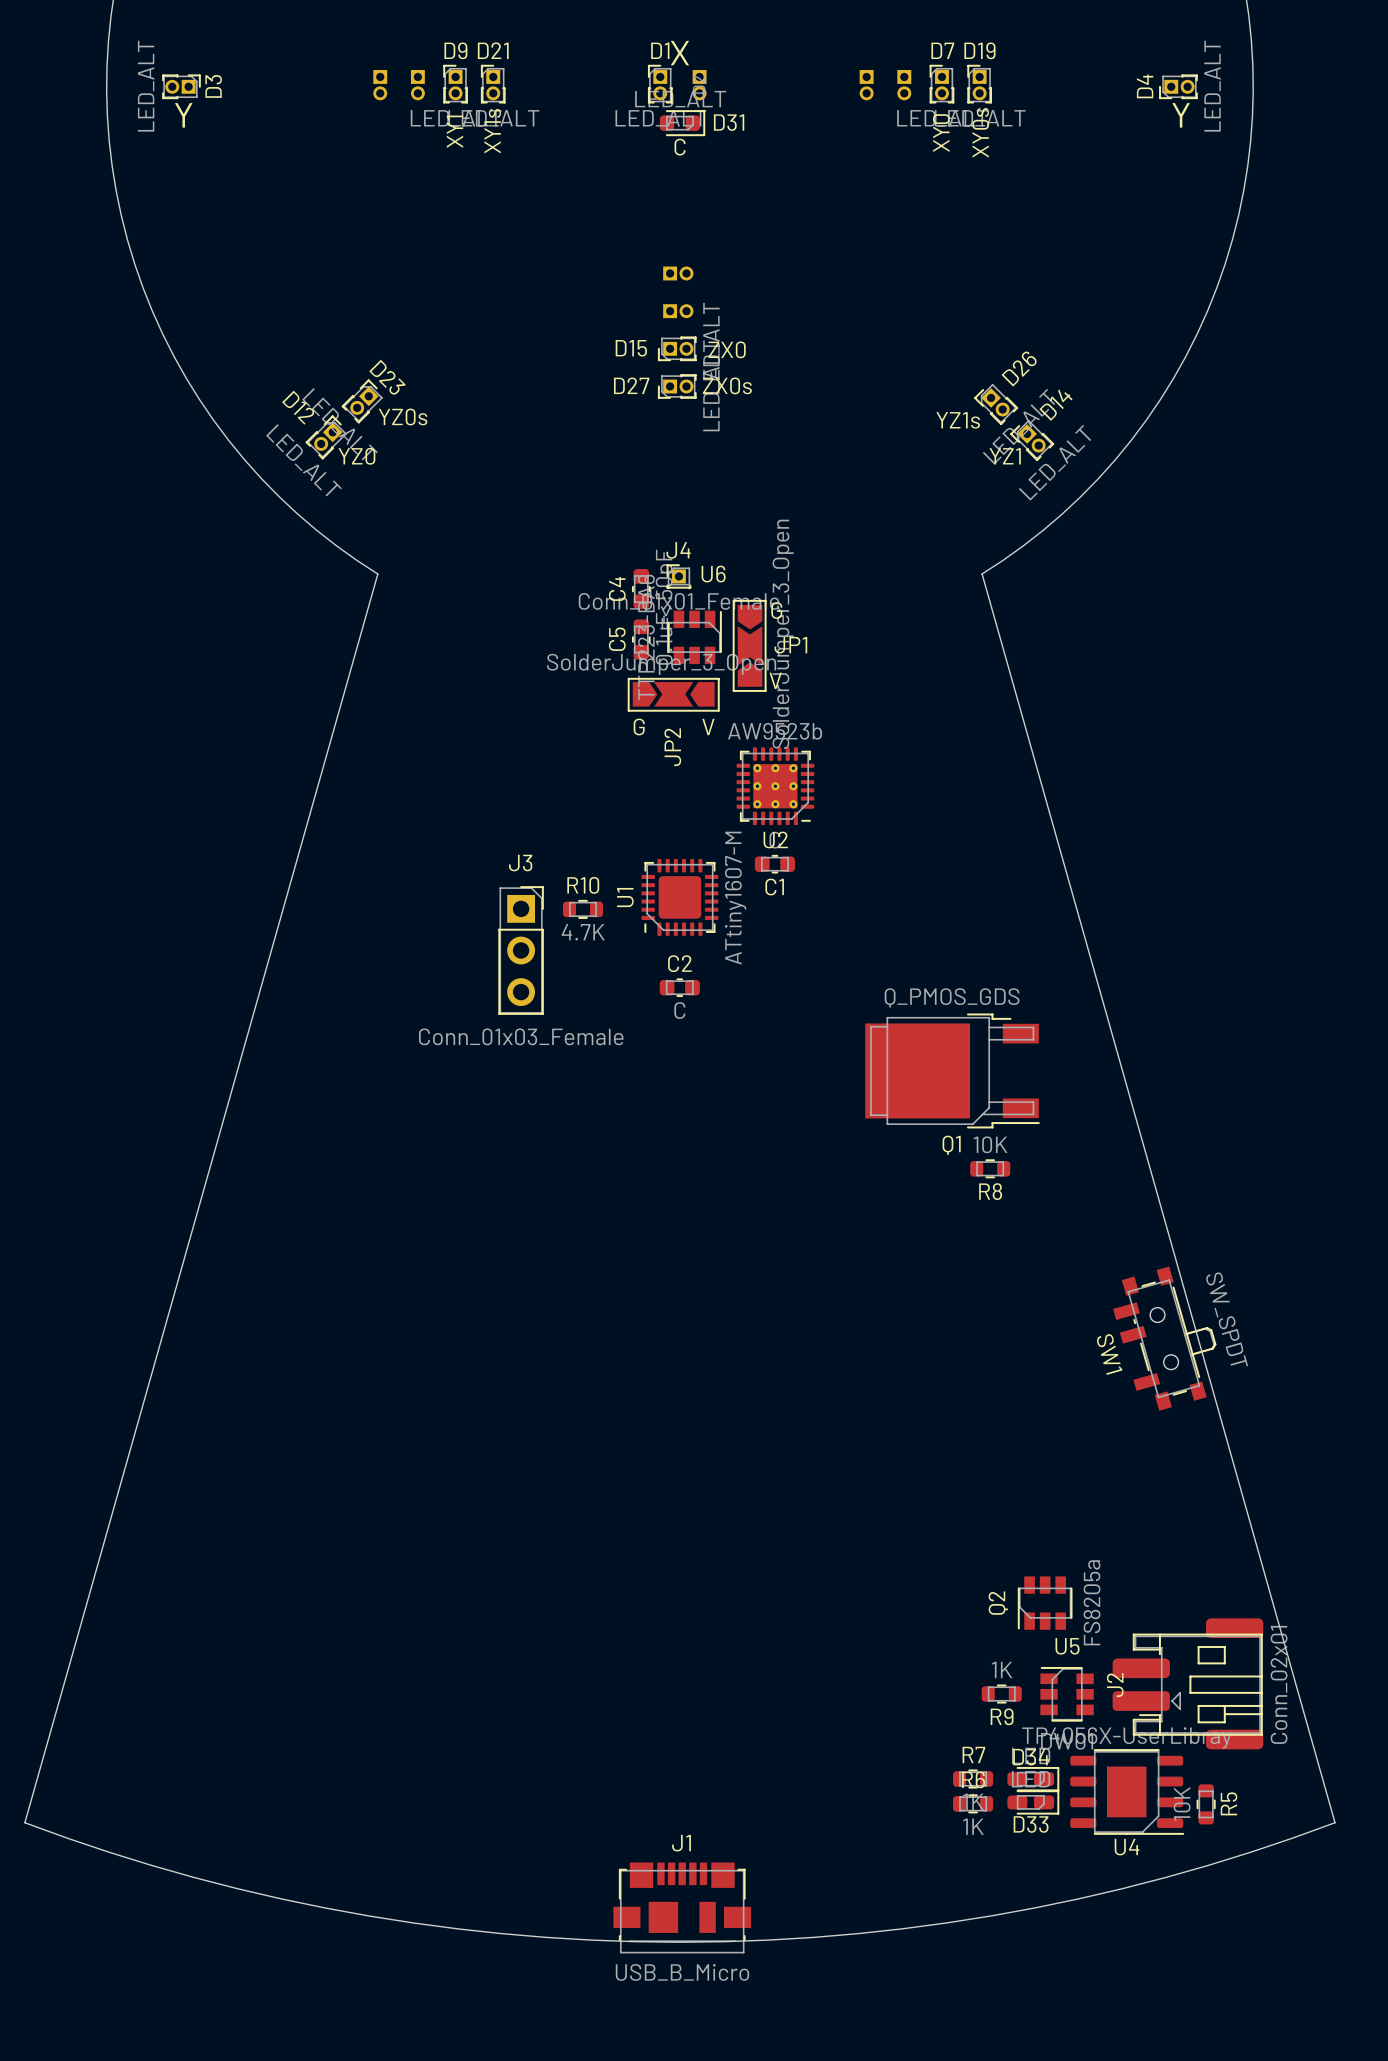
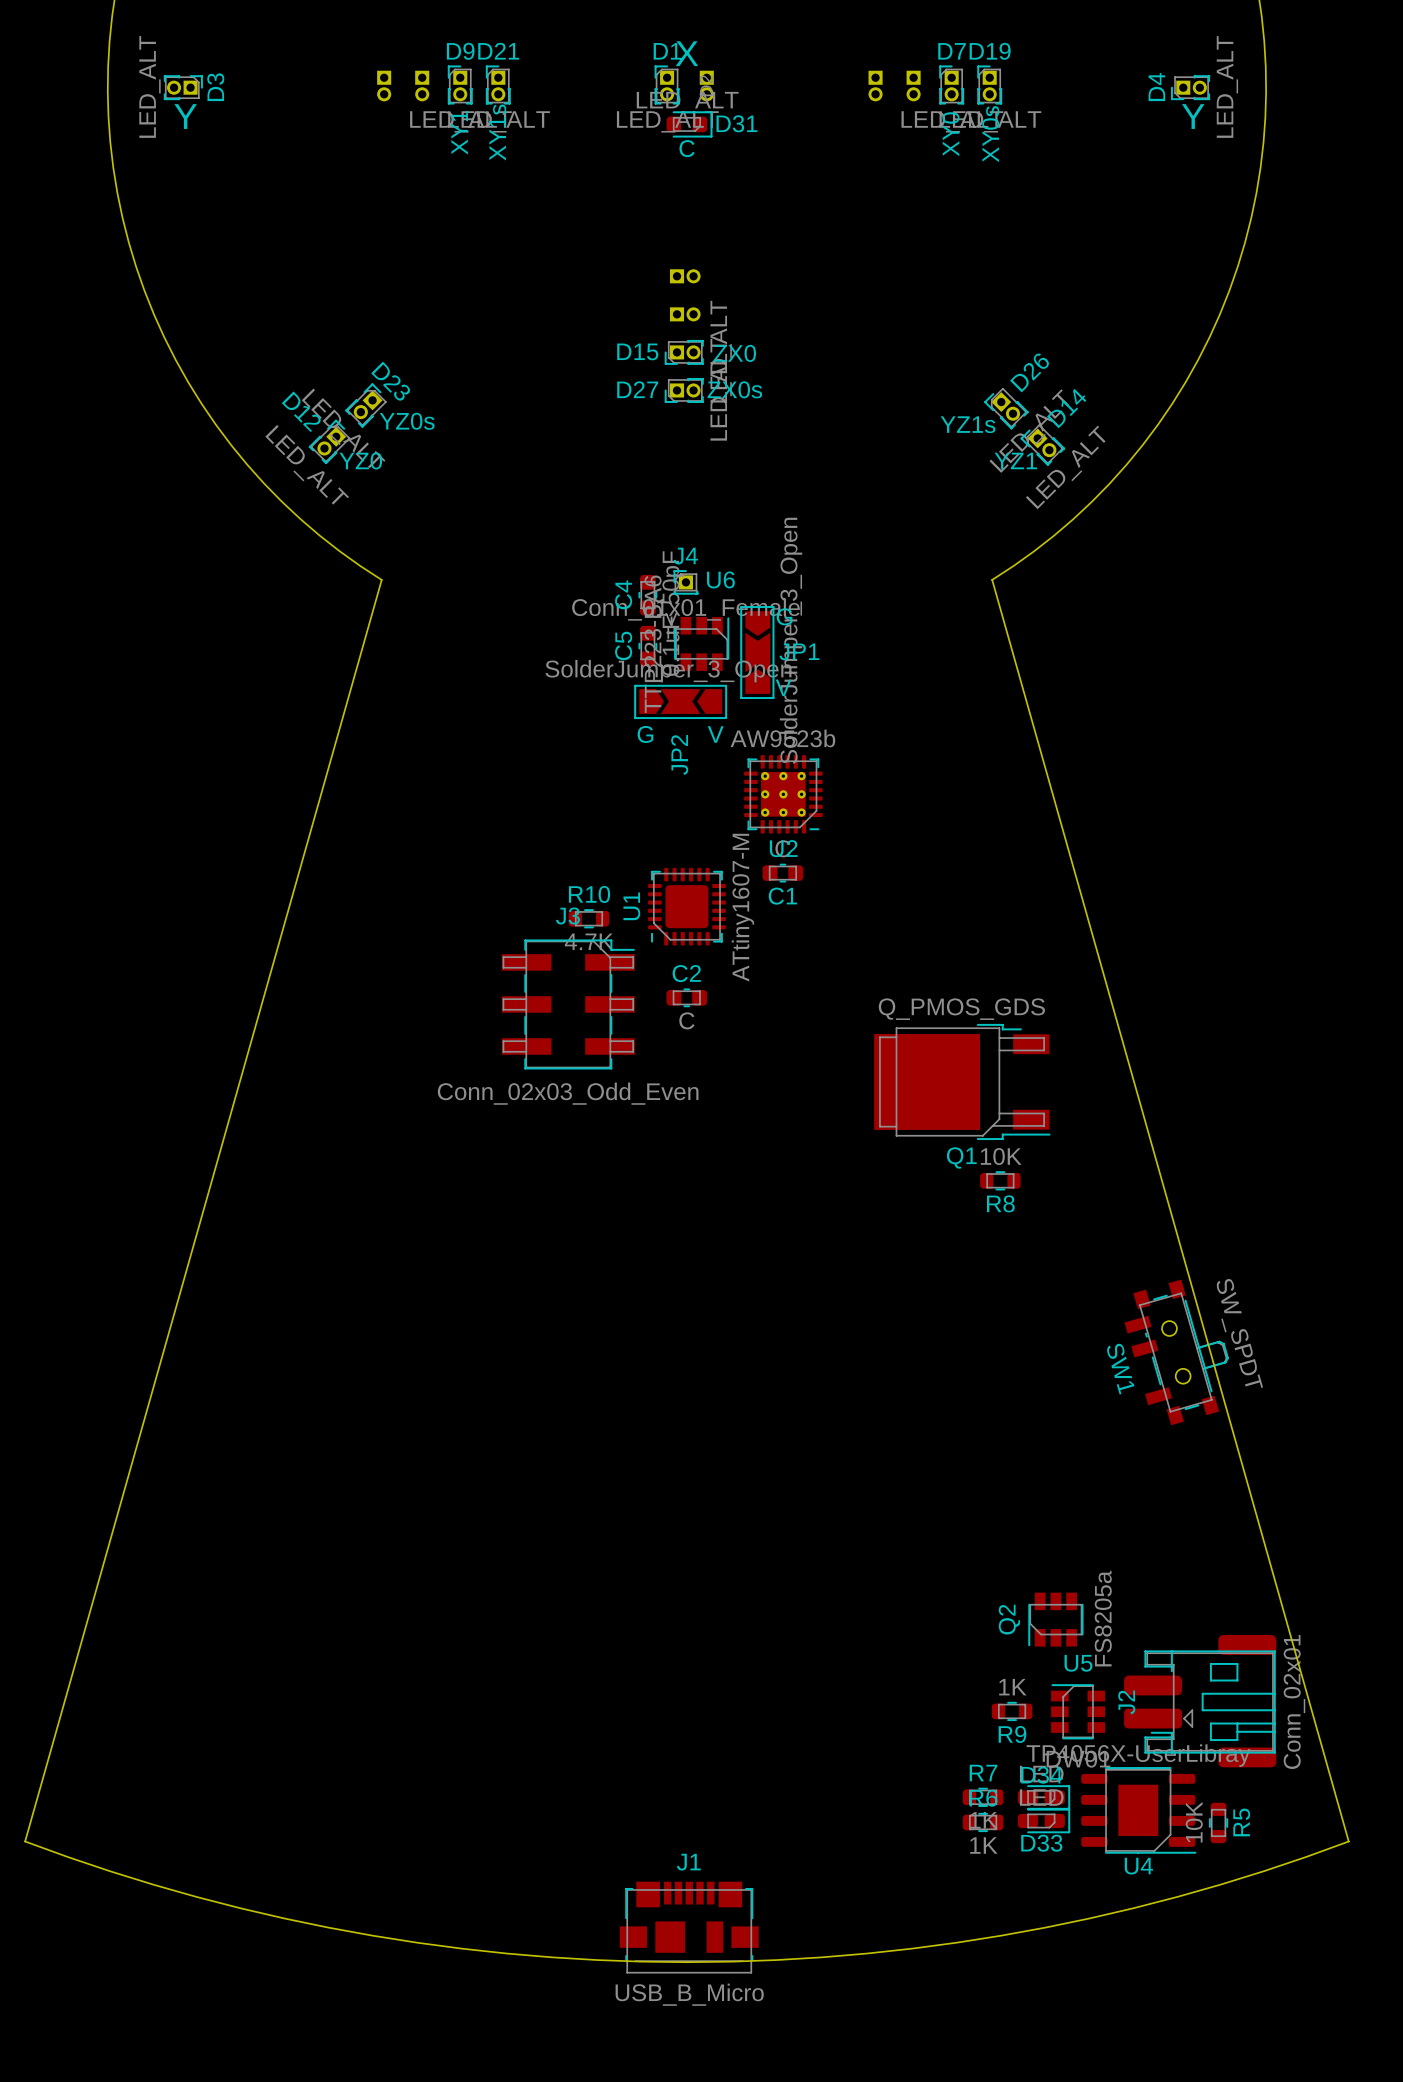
J3 footprint: [498, 886, 544, 1015] -> [501, 939, 635, 1070]
J3 value: Conn_01x03_Female (521, 1036) -> Conn_02x03_Odd_Even (568, 1093)

